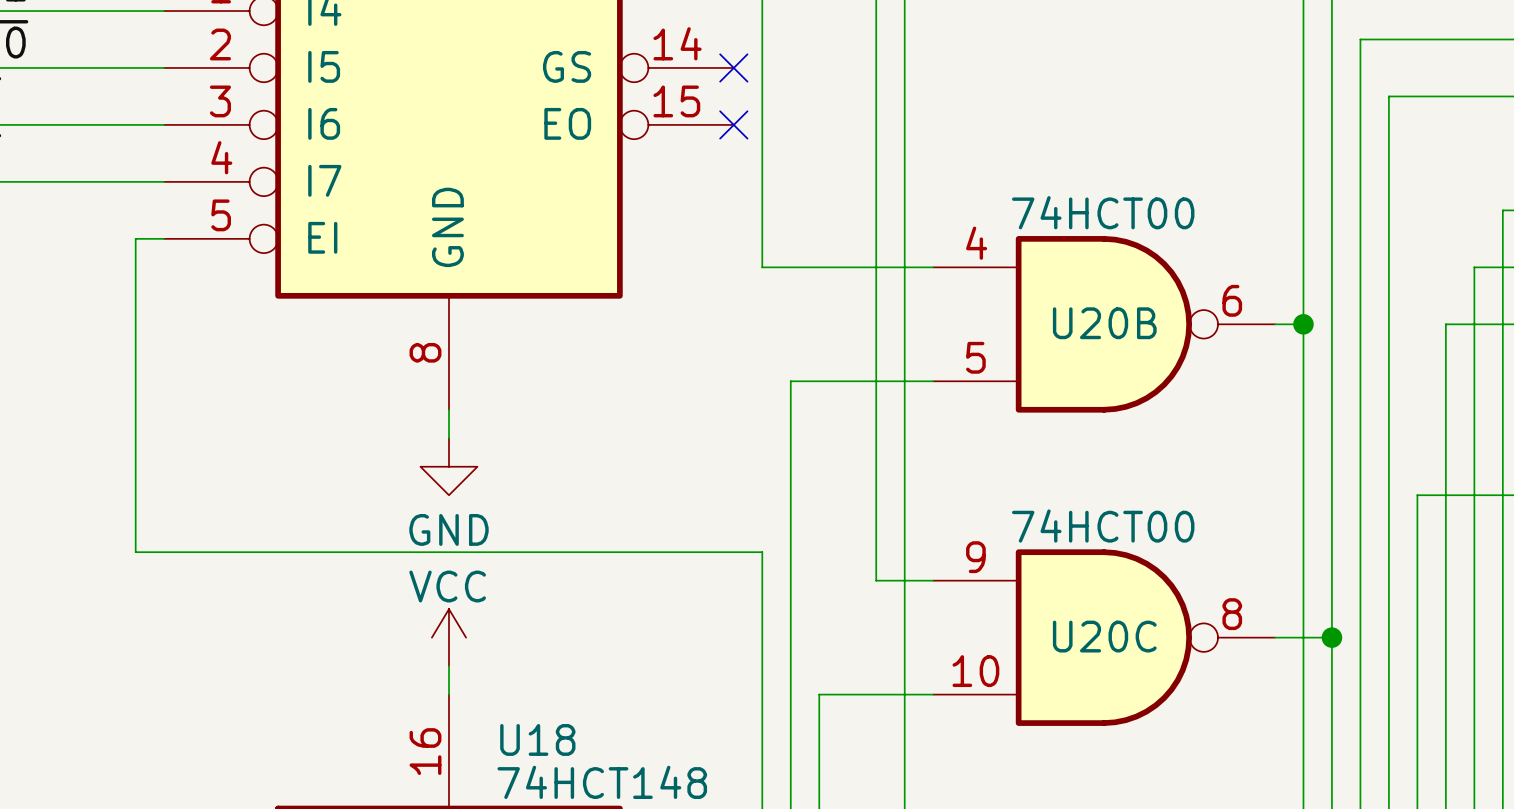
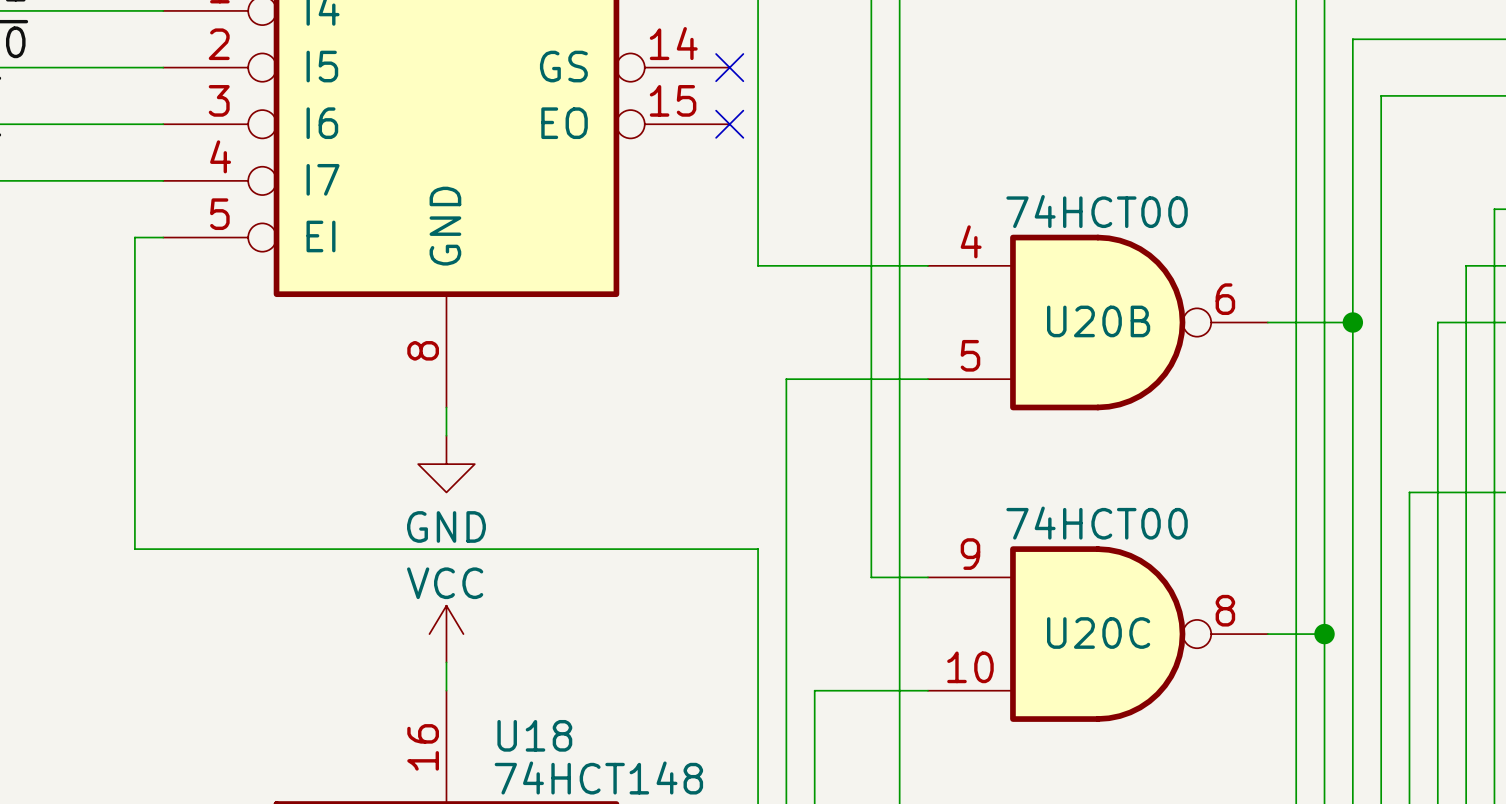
wire: none -> (1296, 322) (1352, 322)
junction position: (1303, 324) -> (1352, 322)

